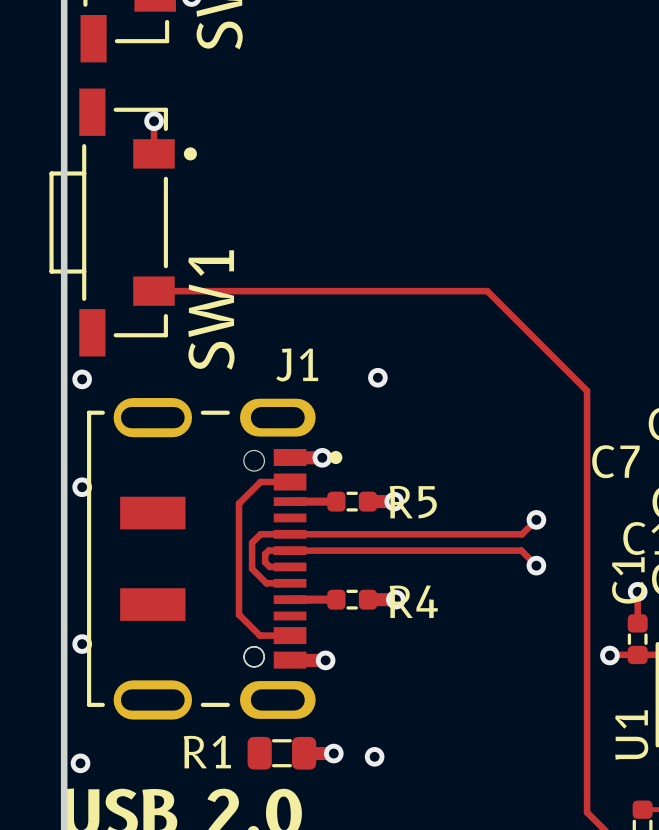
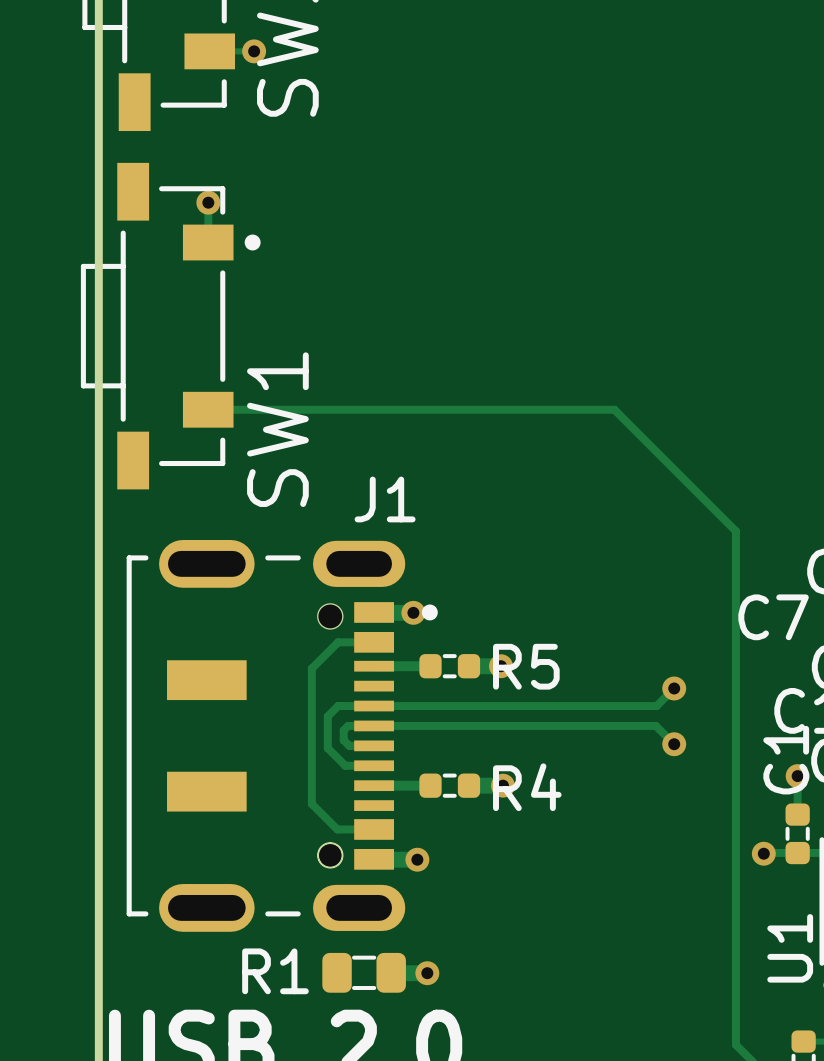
via: (377, 377) -> none
via: (82, 379) -> none
via: (82, 487) -> none
via: (82, 644) -> none
via: (374, 756) -> none
via: (80, 763) -> none

